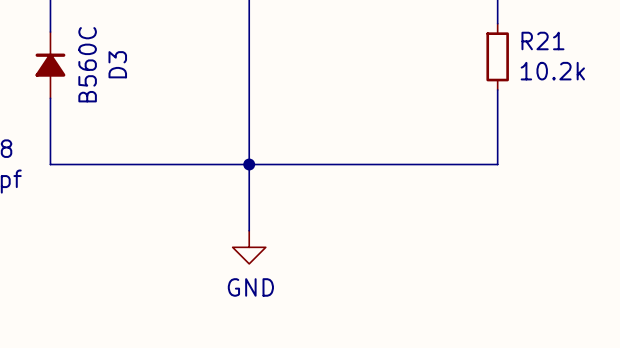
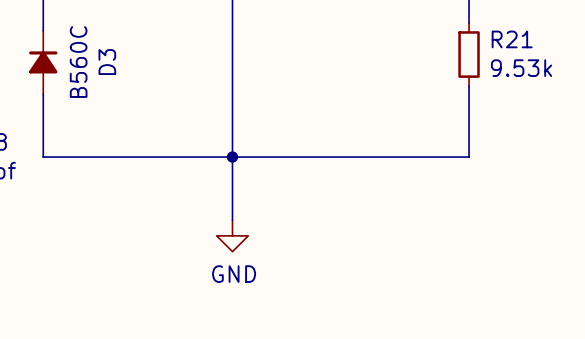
R21 value: 10.2k (552, 71) -> 9.53k (521, 68)

